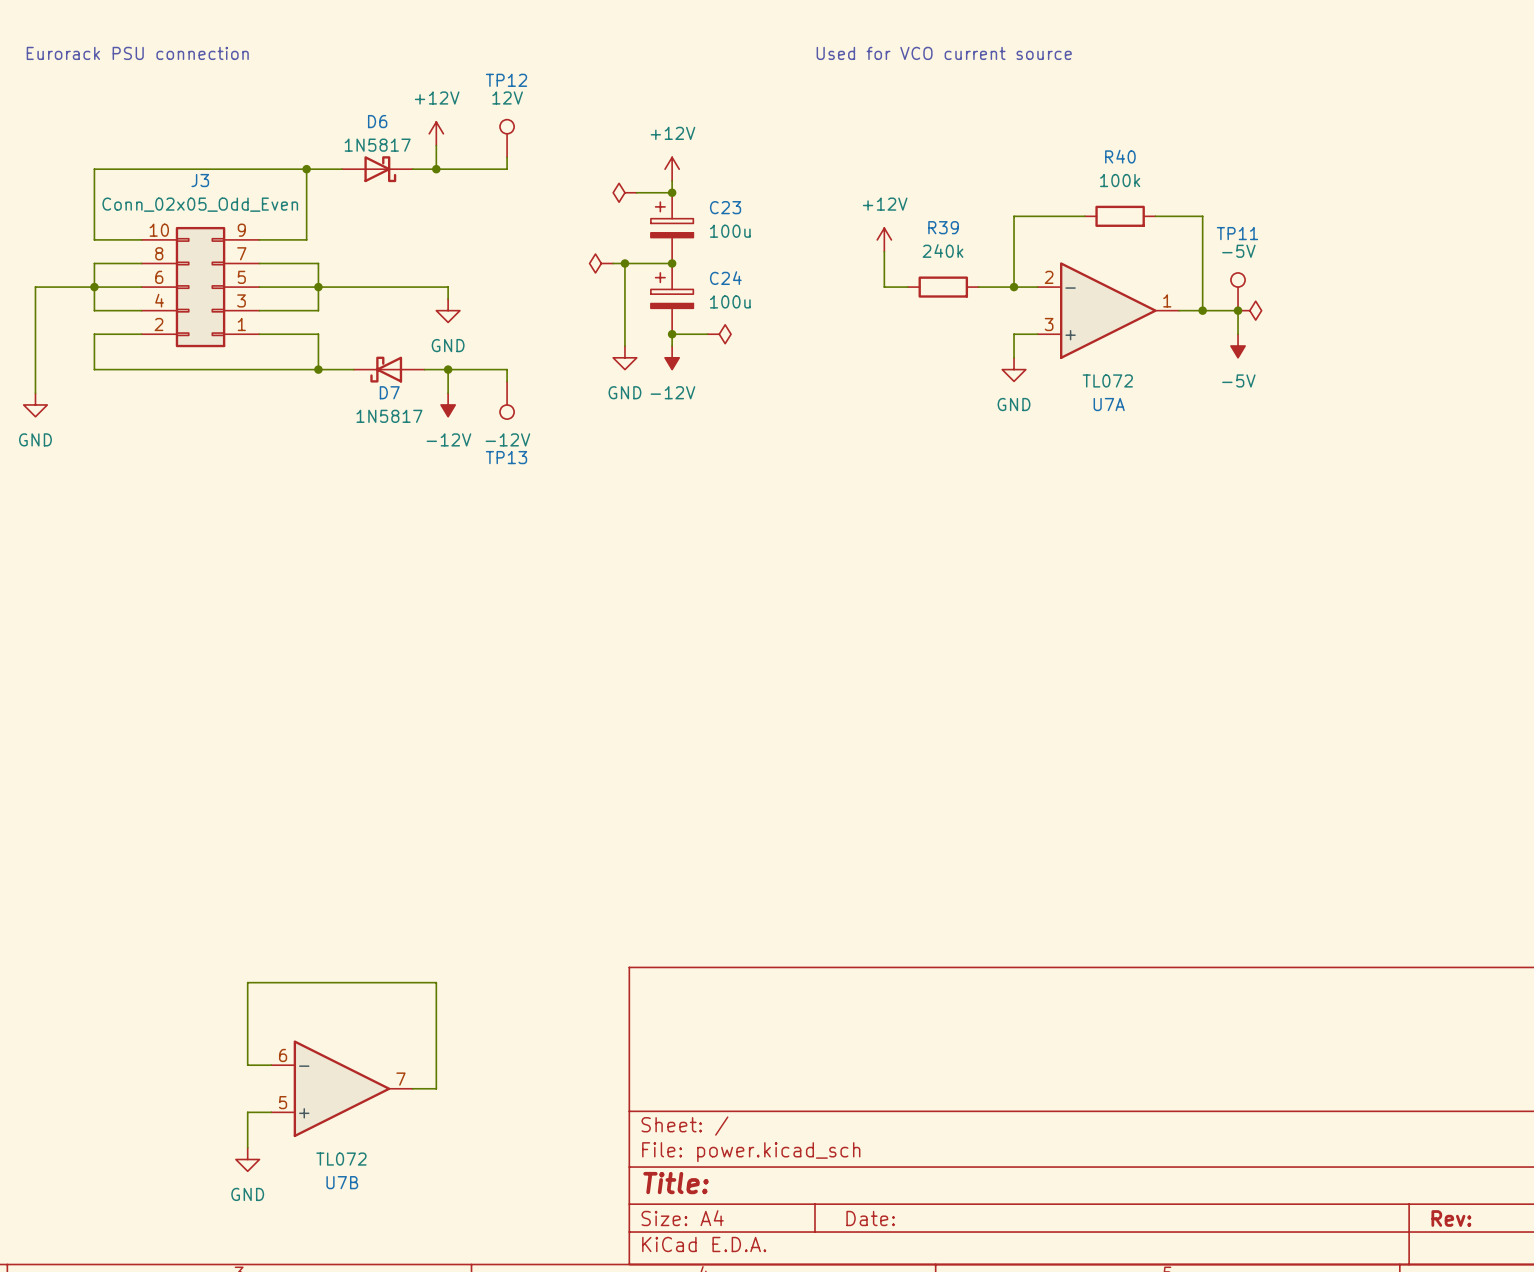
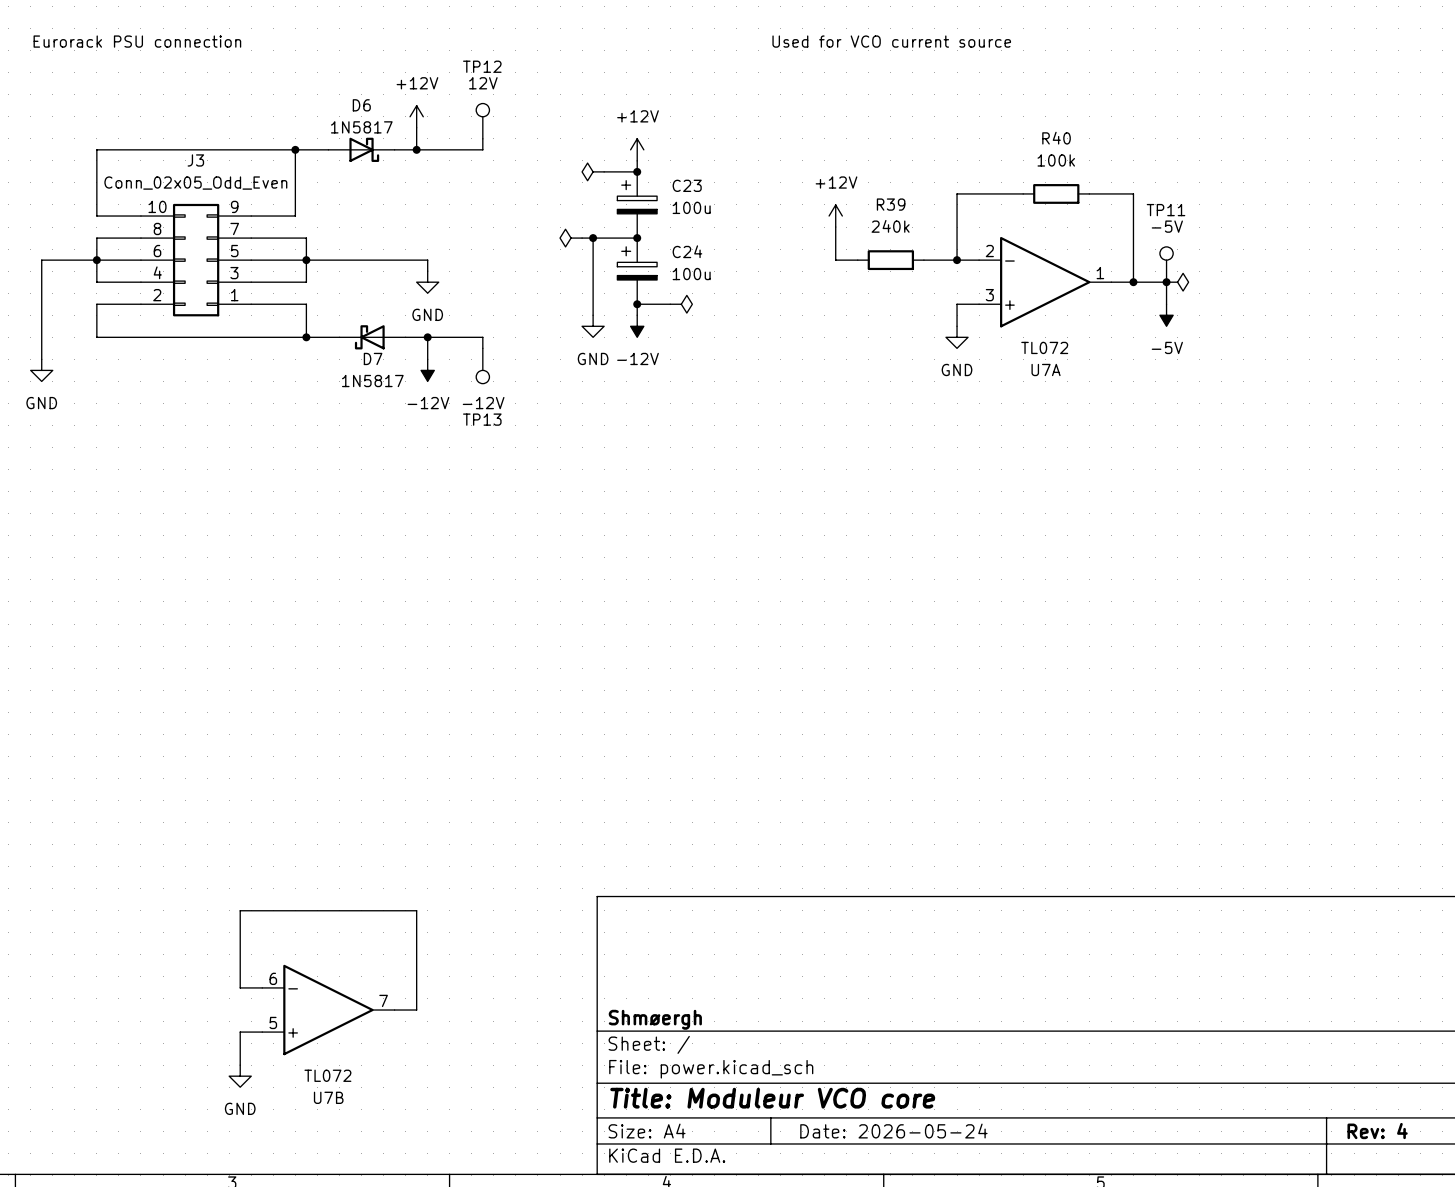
title block: none -> Shmøergh (655, 1019)
title block: Title: (676, 1183) -> Title: Moduleur VCO core (772, 1098)
title block: Date: (870, 1218) -> Date: 2026-05-24 (893, 1131)
title block: Rev: (1451, 1218) -> Rev: 4 (1377, 1131)

